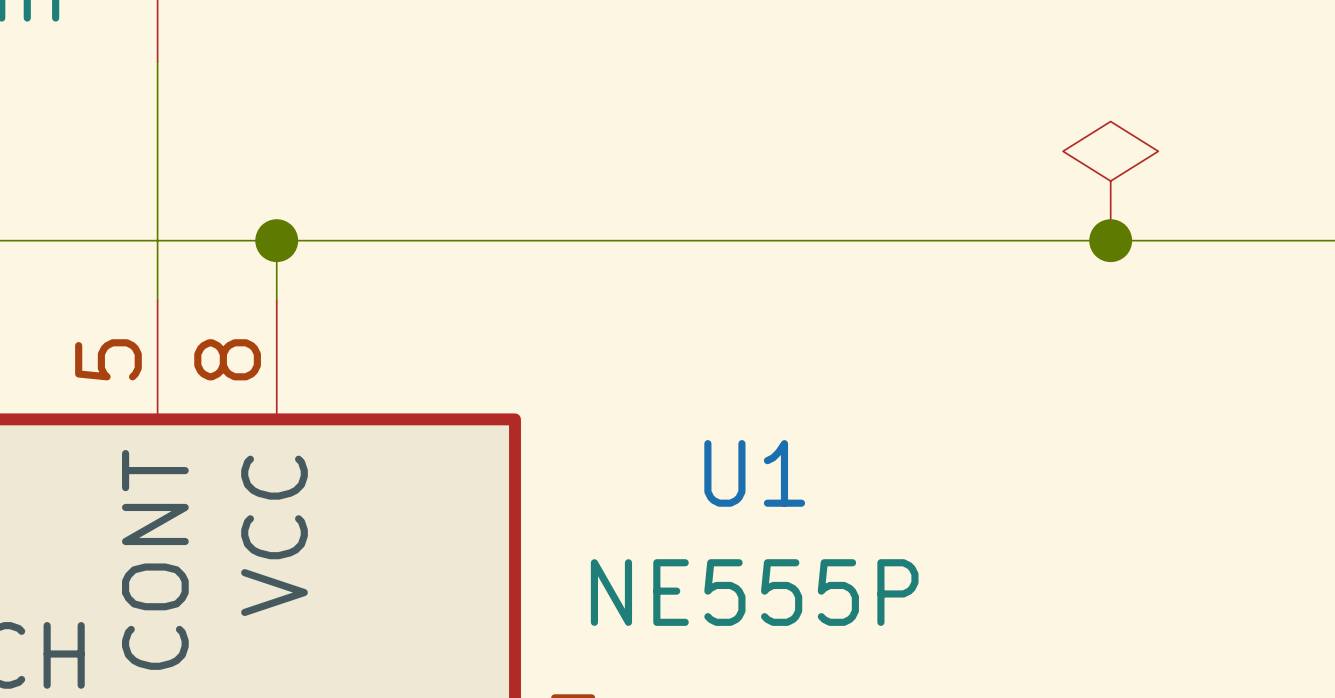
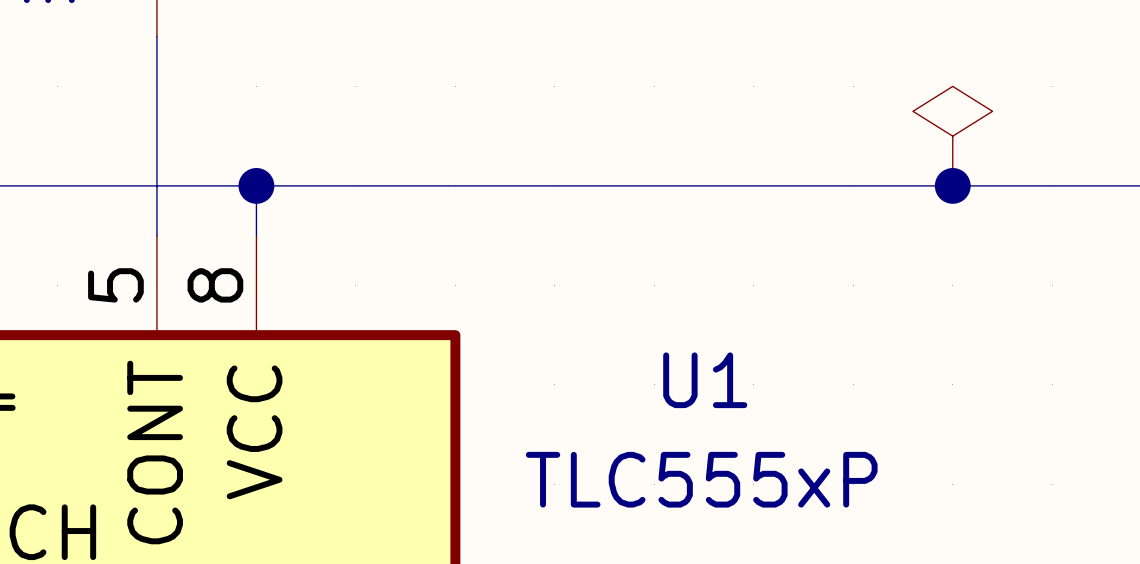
U1 name position: U1 (754, 473) -> U1 (705, 380)
U1 value: NE555P (754, 592) -> TLC555xP (701, 479)

